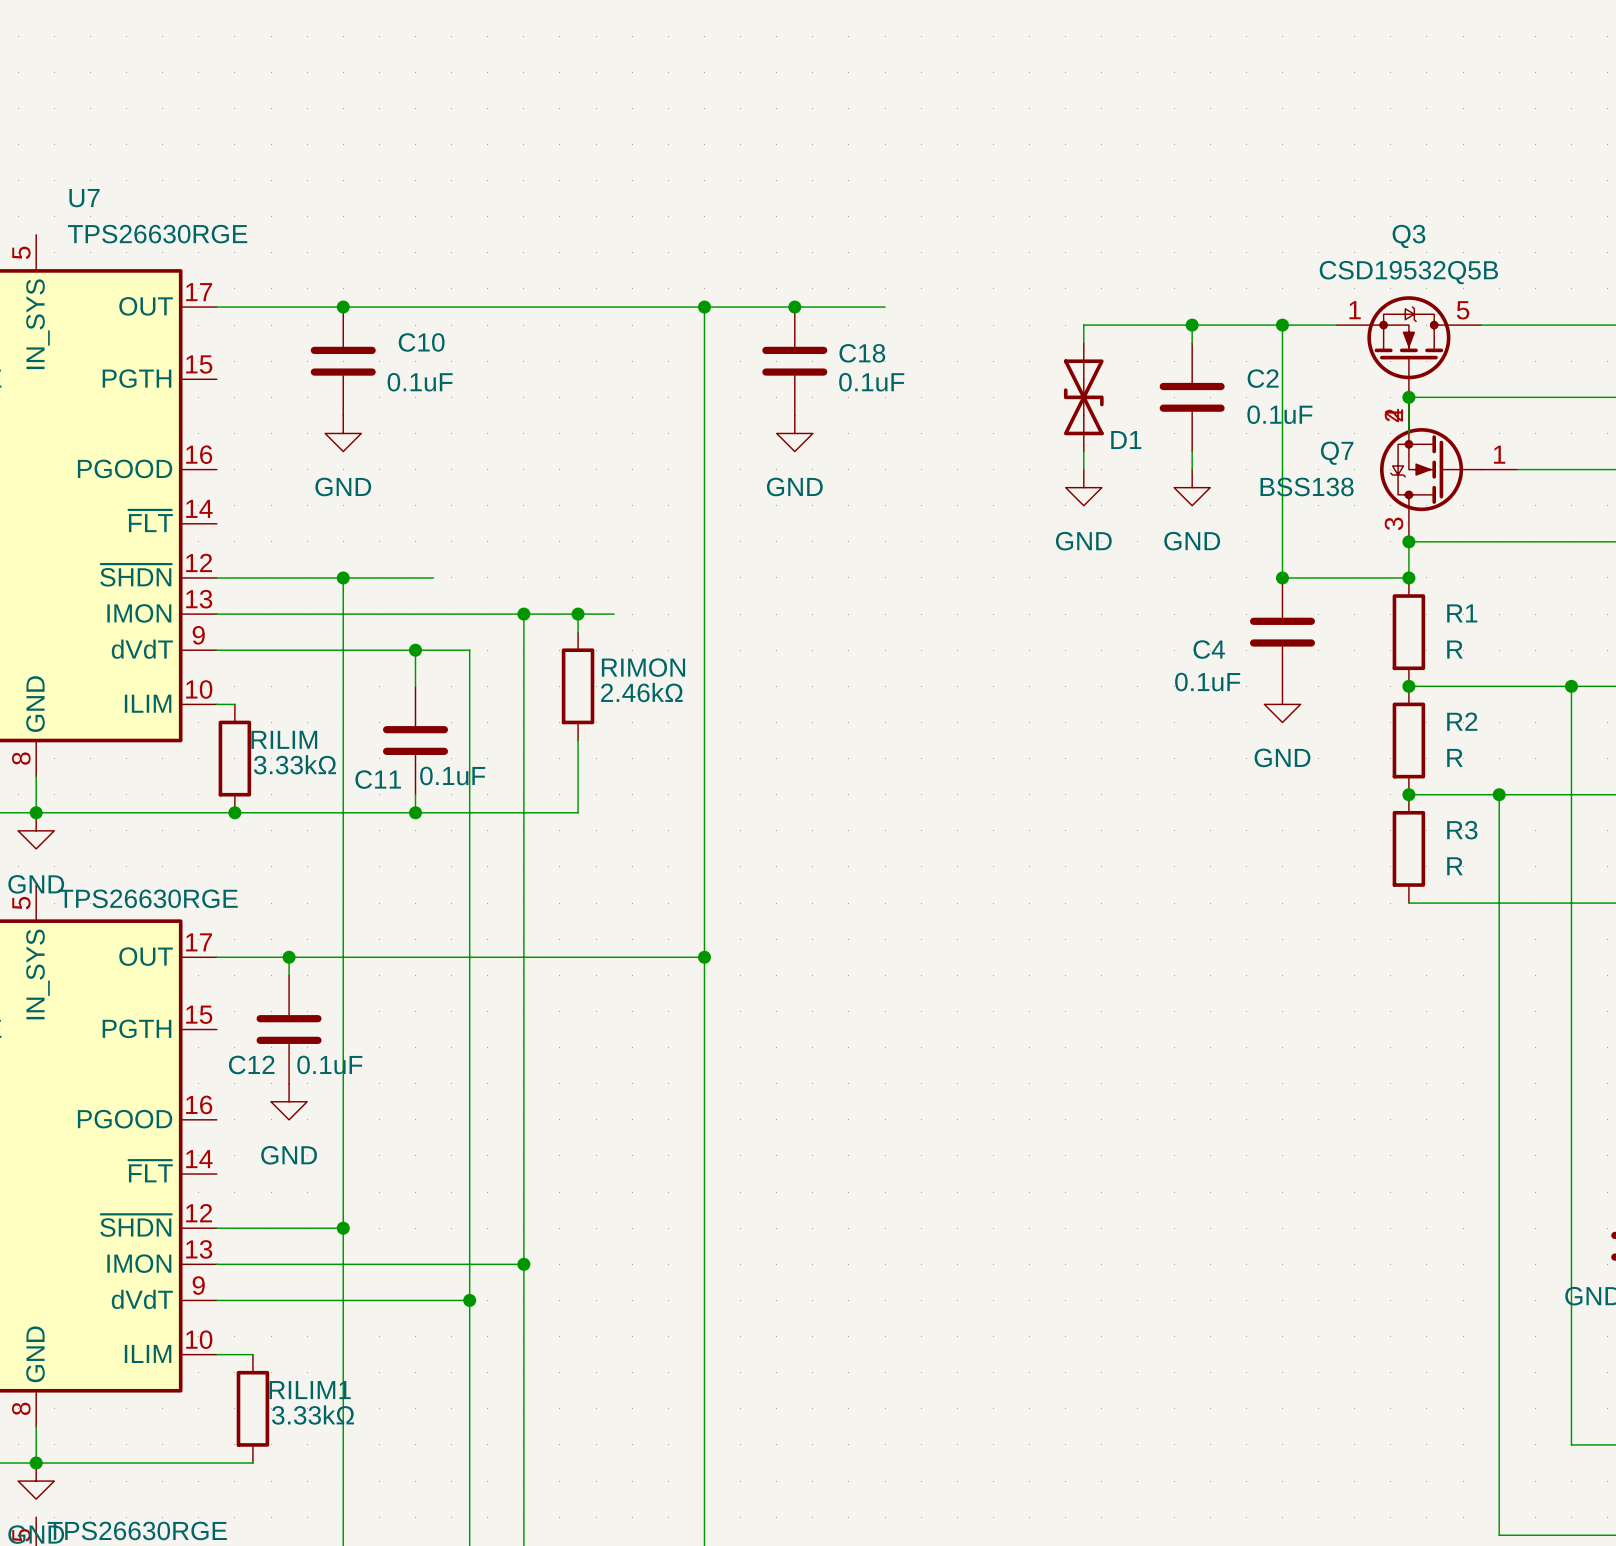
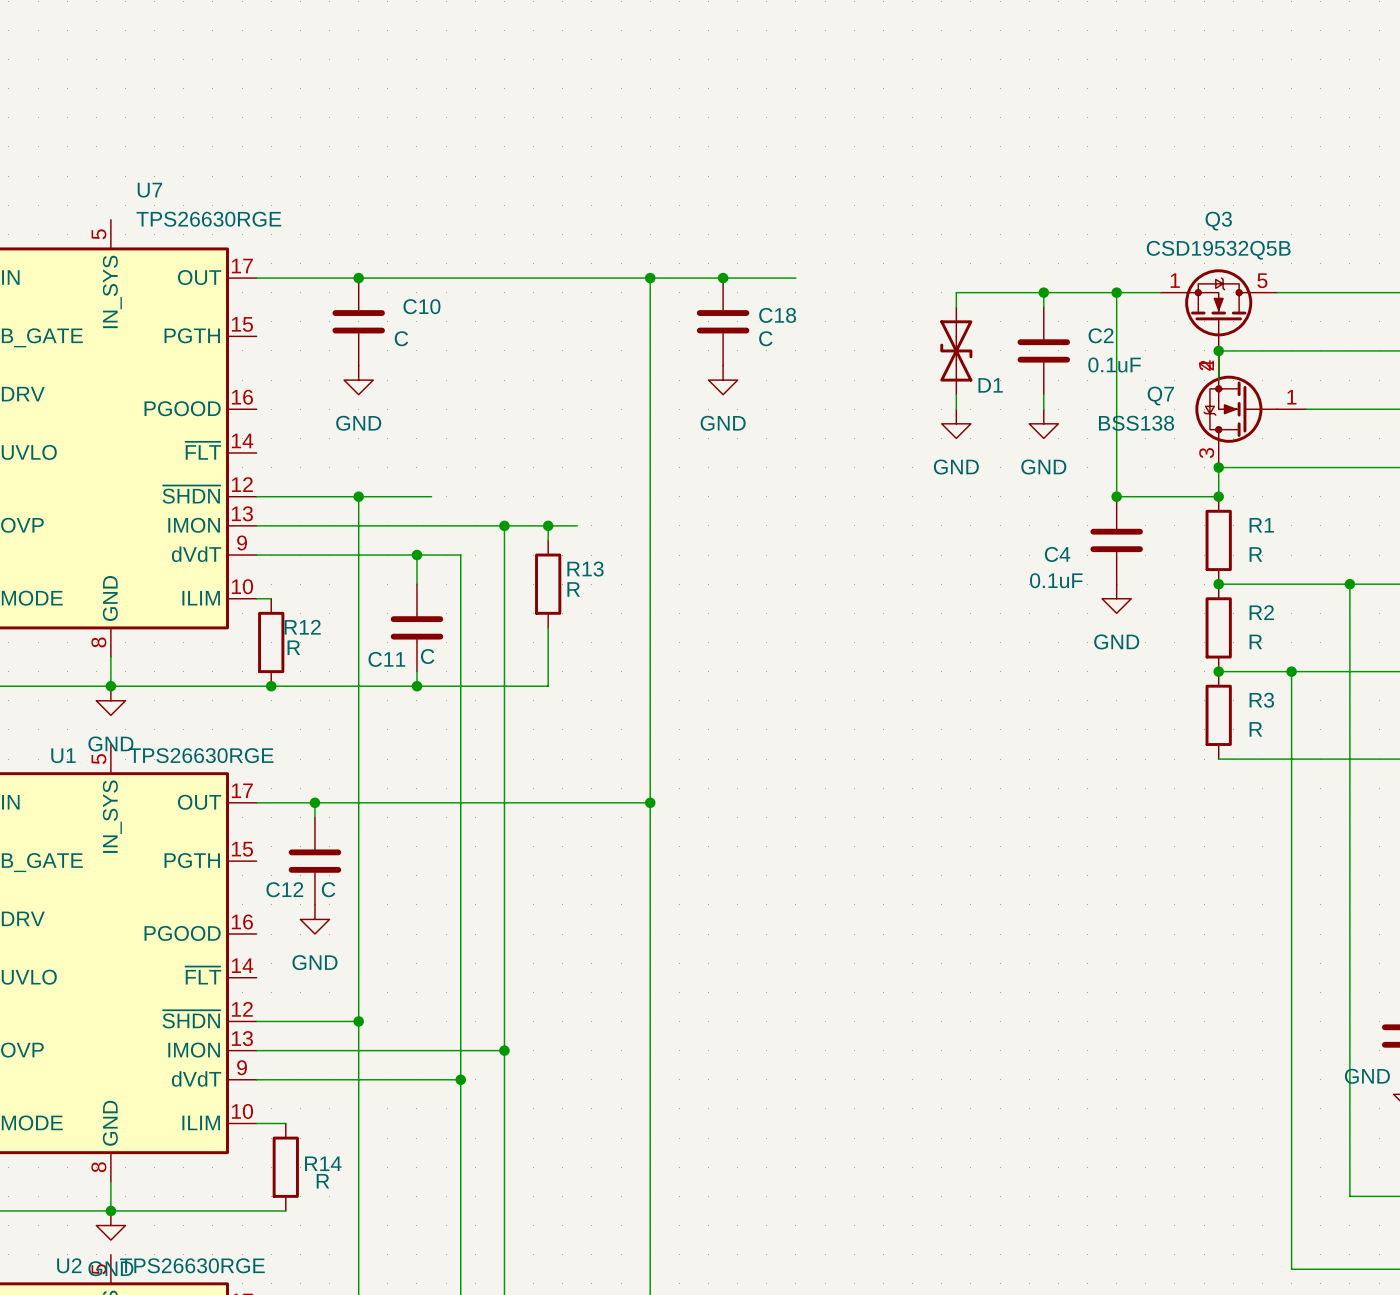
C10 value: 0.1uF (420, 382) -> C (401, 338)
C18 value: 0.1uF (871, 382) -> C (765, 338)
RIMON name: RIMON (643, 667) -> R13 (585, 569)
RIMON value: 2.46kΩ (641, 692) -> R (573, 589)
RILIM name: RILIM (284, 739) -> R12 (302, 627)
RILIM value: 3.33kΩ (294, 764) -> R (293, 647)
C11 value: 0.1uF (452, 775) -> C (427, 656)
C12 value: 0.1uF (329, 1064) -> C (328, 889)
RILIM1 name: RILIM1 (310, 1390) -> R14 (323, 1163)
RILIM1 value: 3.33kΩ (312, 1415) -> R (322, 1181)

